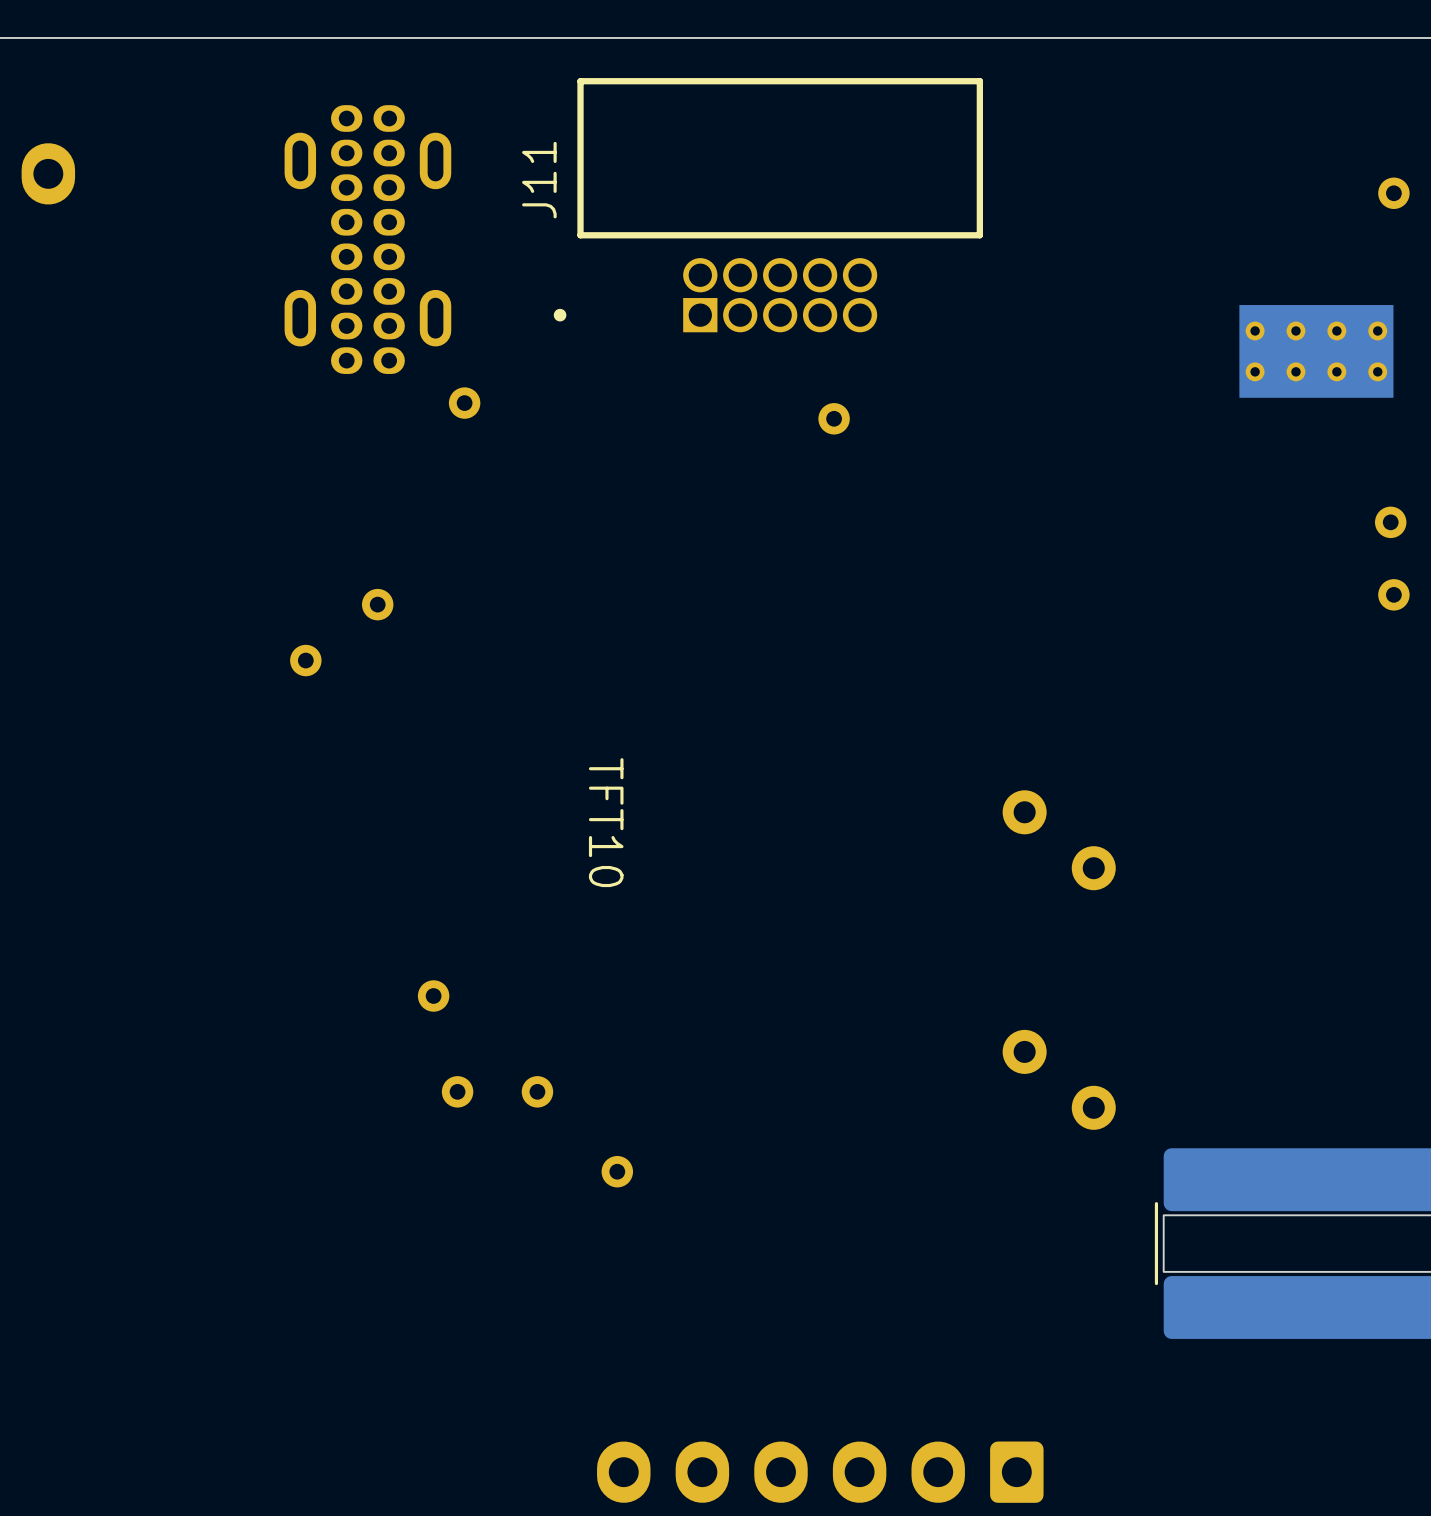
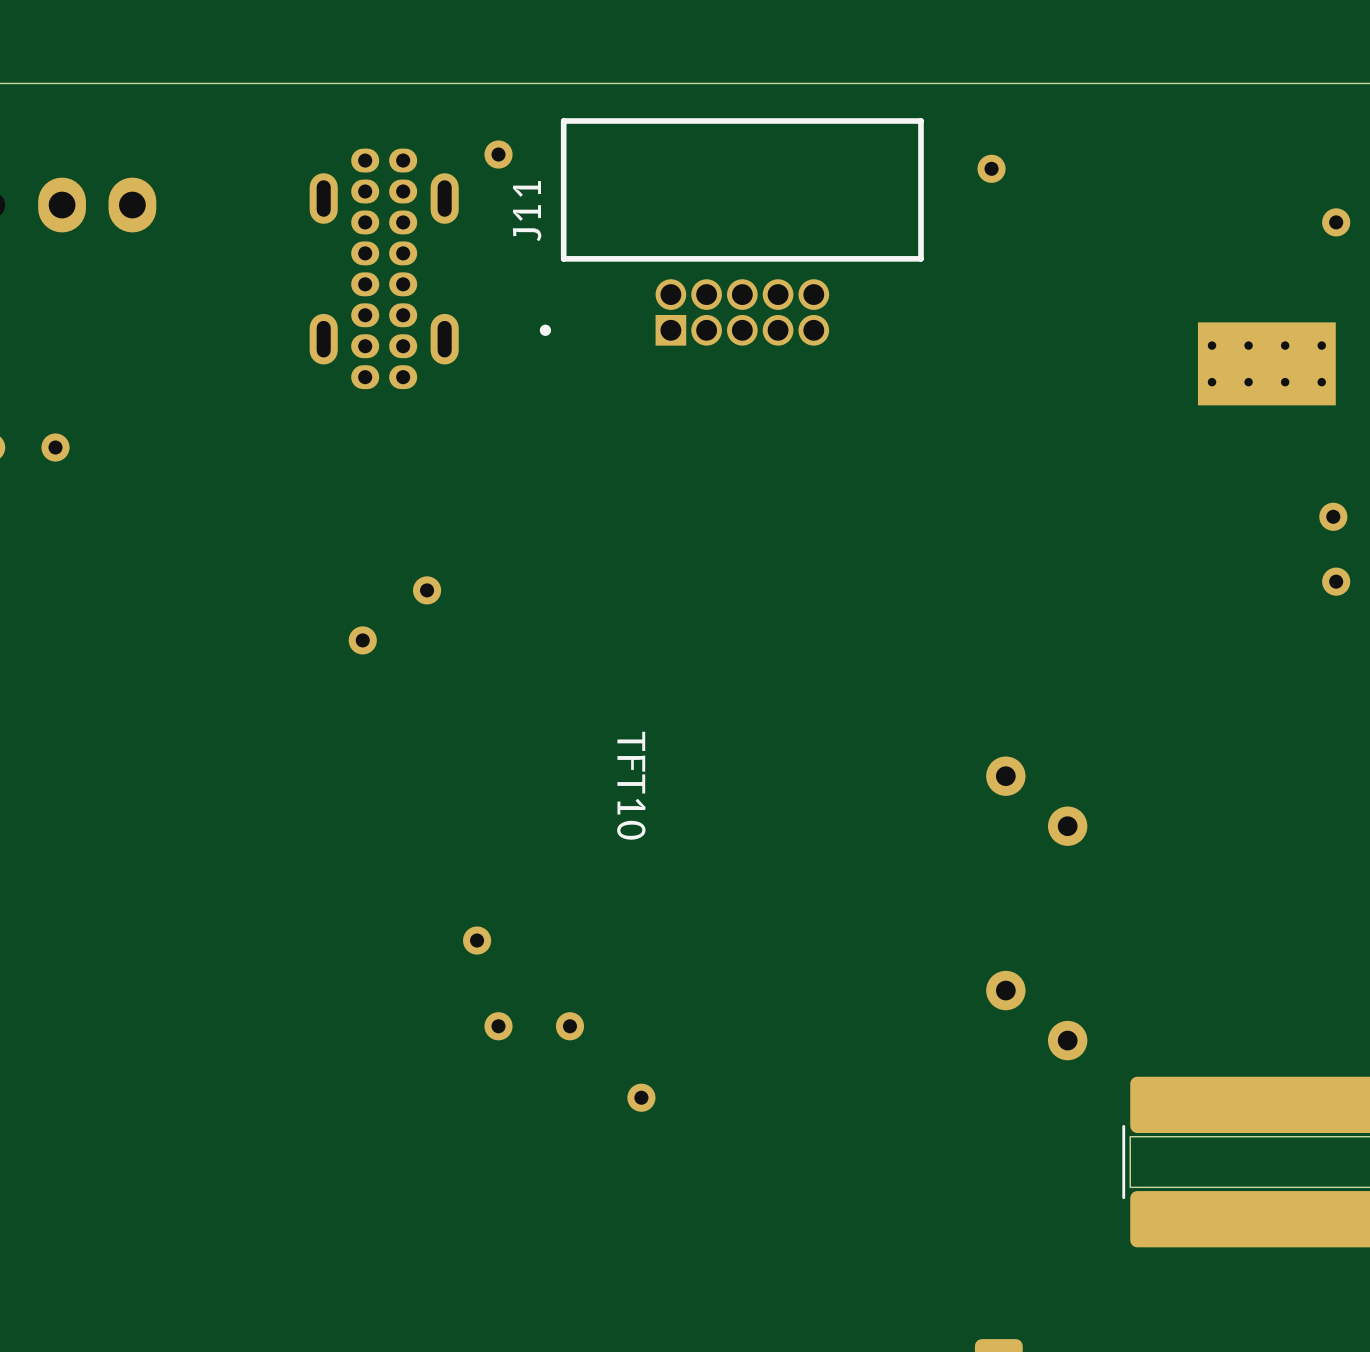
part: none -> (498, 154)
part: none -> (991, 168)
J11 position: (768, 205) -> (731, 231)
part position: (367, 239) -> (384, 268)
part: (464, 403) -> none
part: (834, 418) -> none

